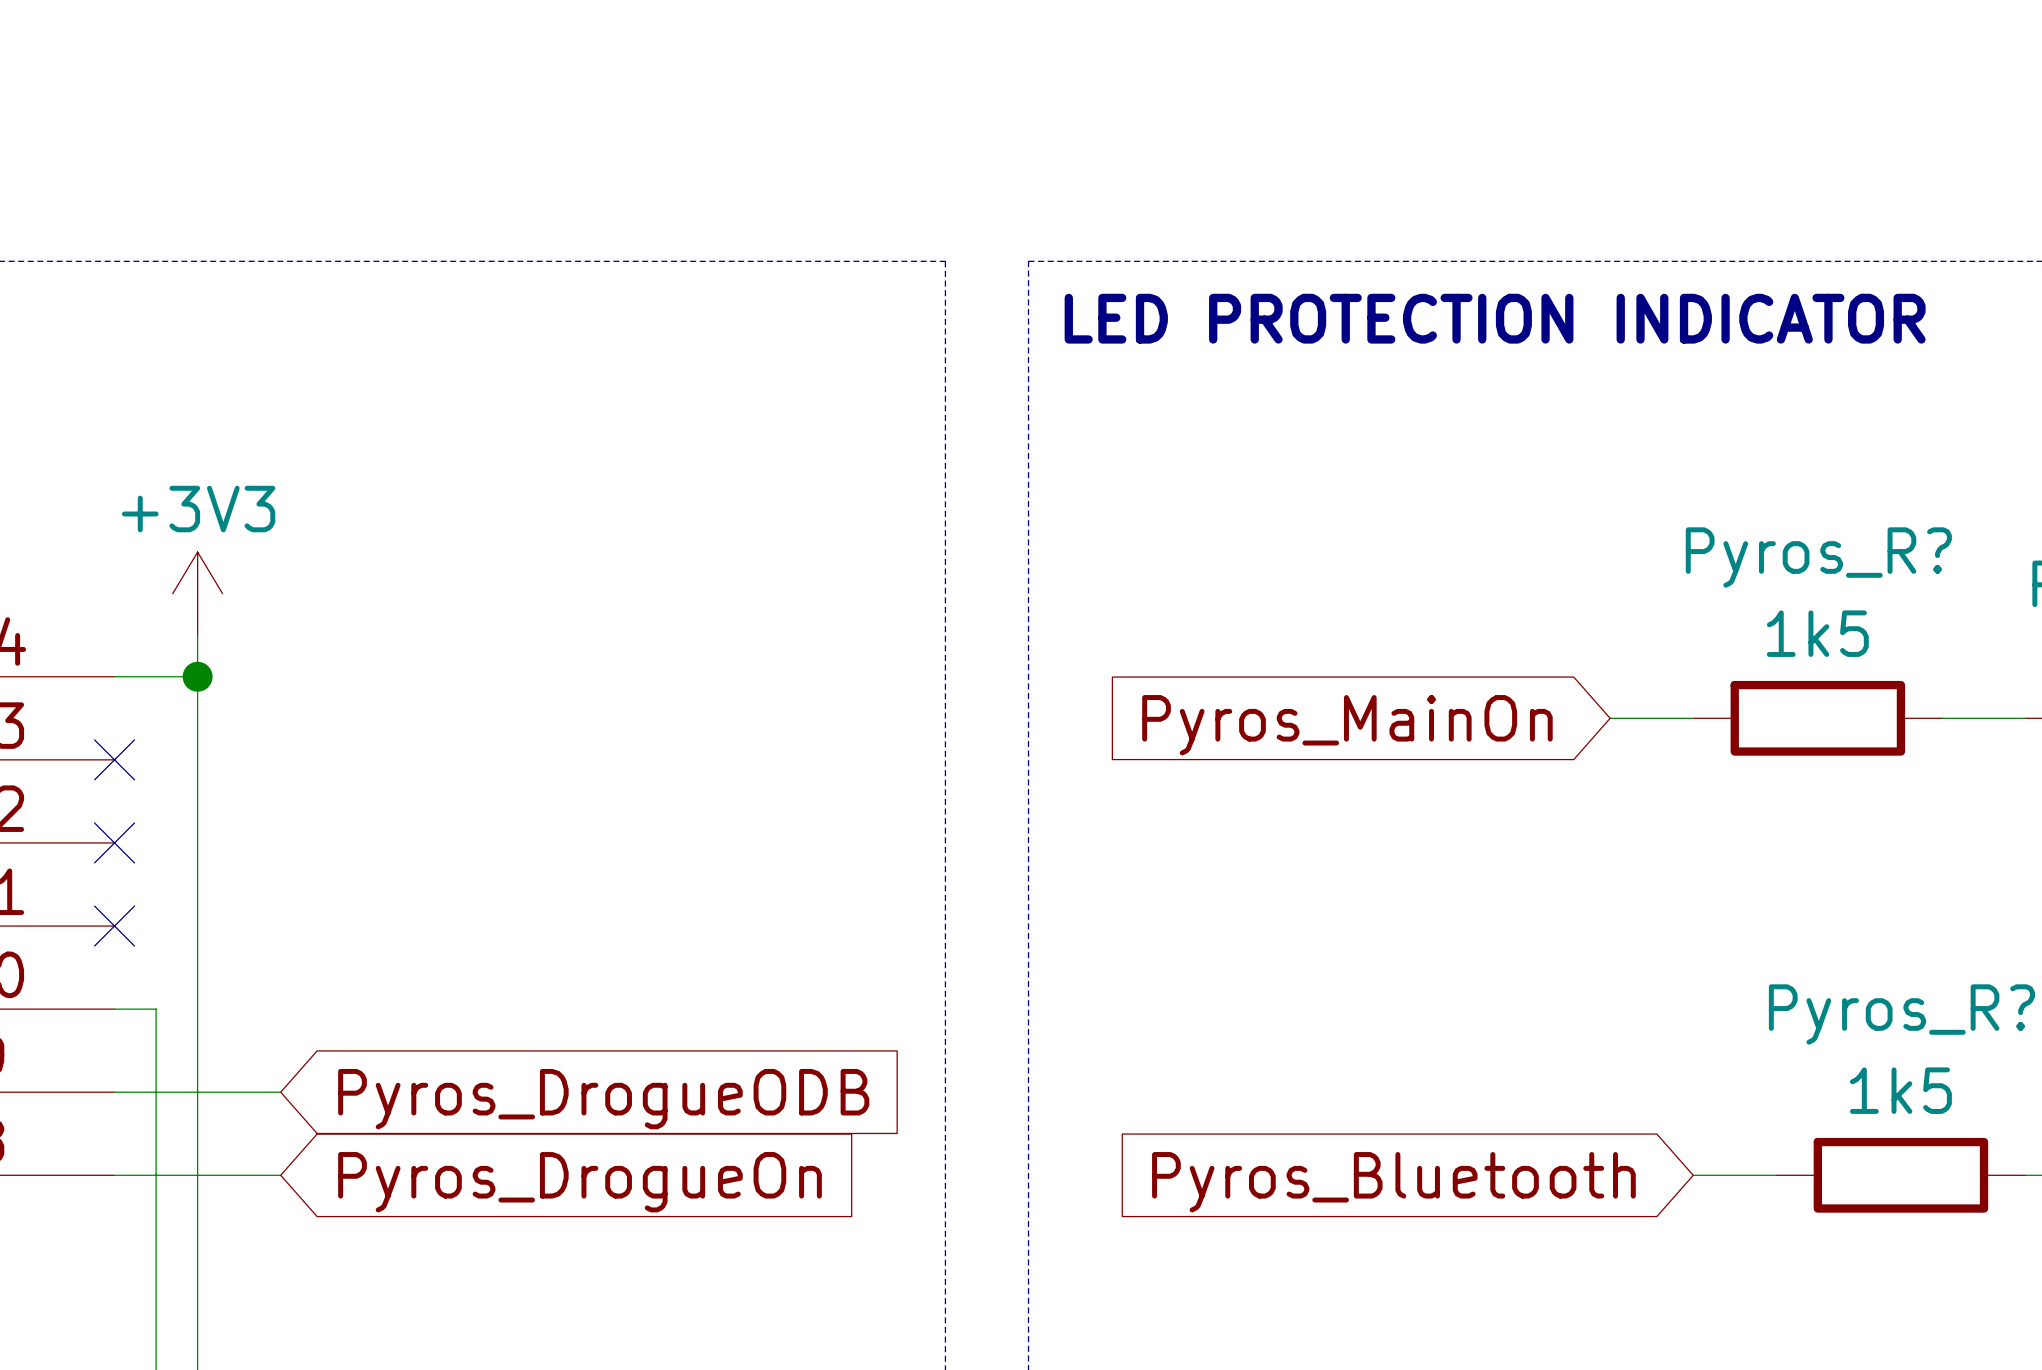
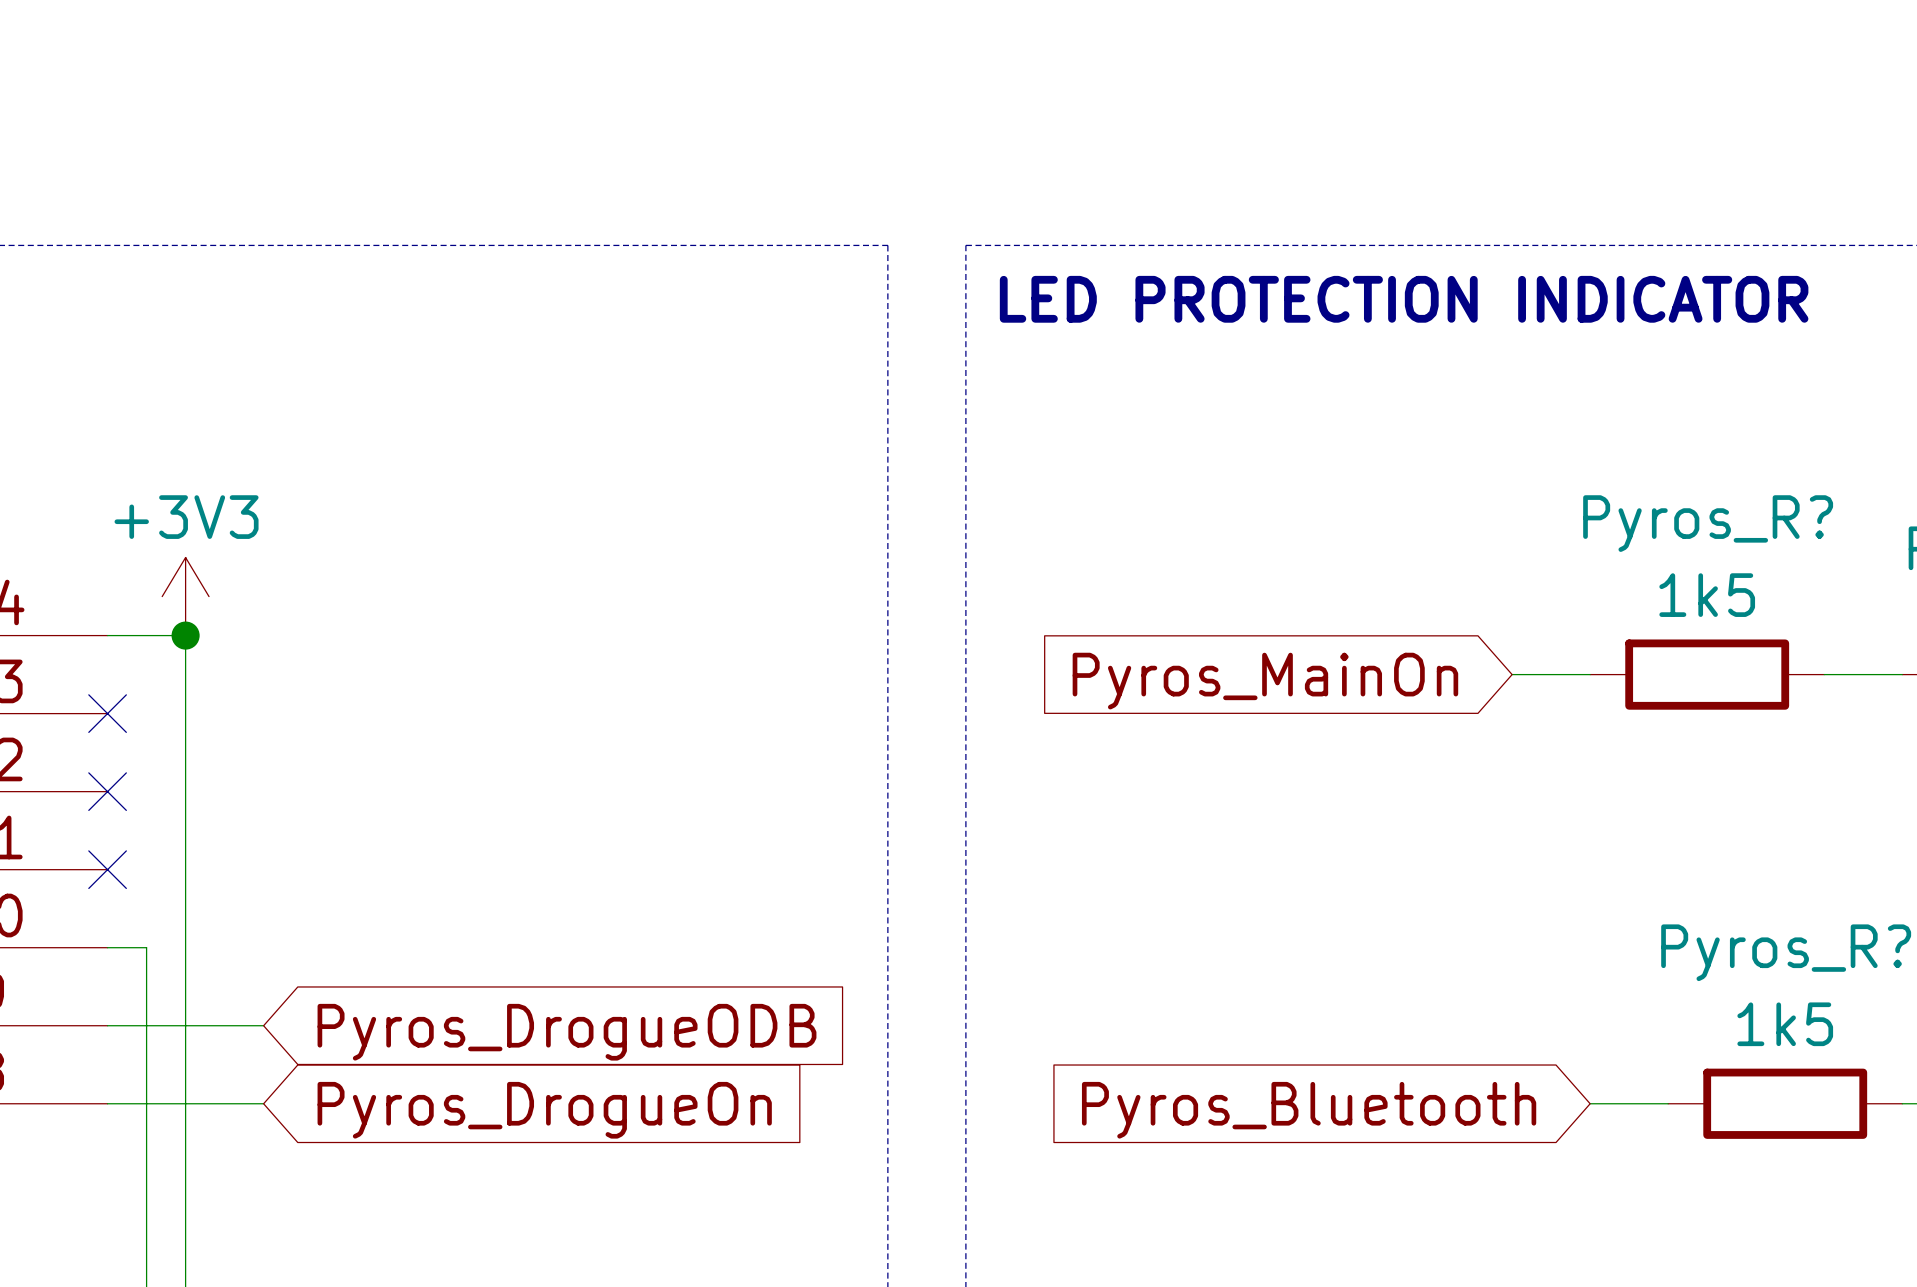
power symbol position: +3V3 (197, 593) -> +3V3 (185, 596)

